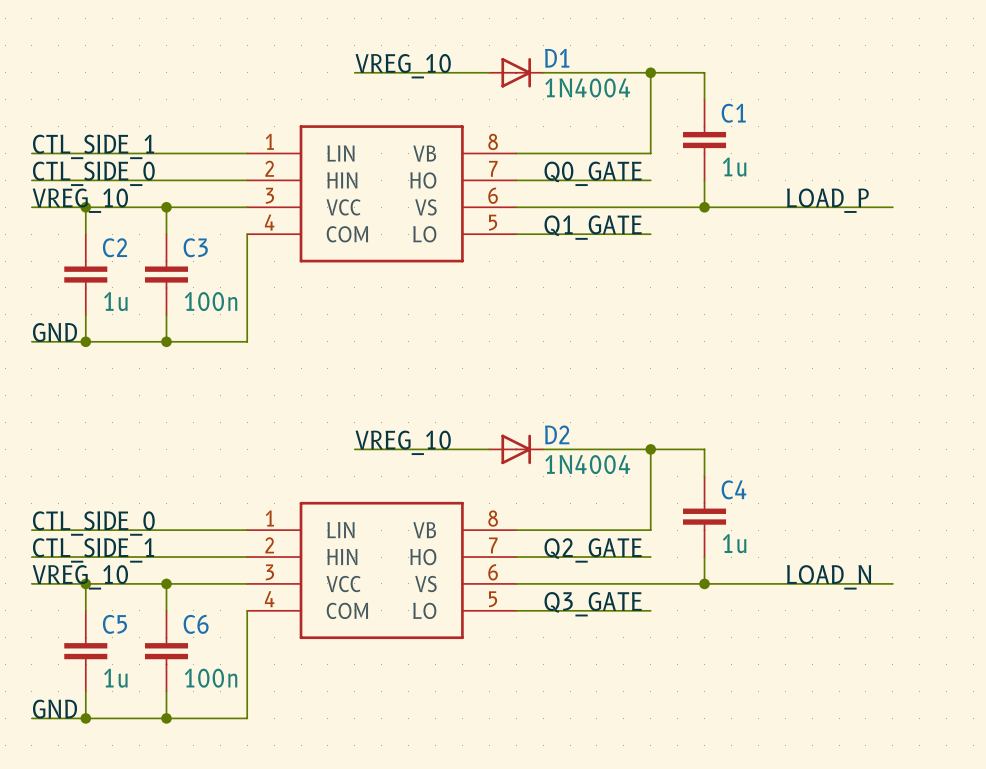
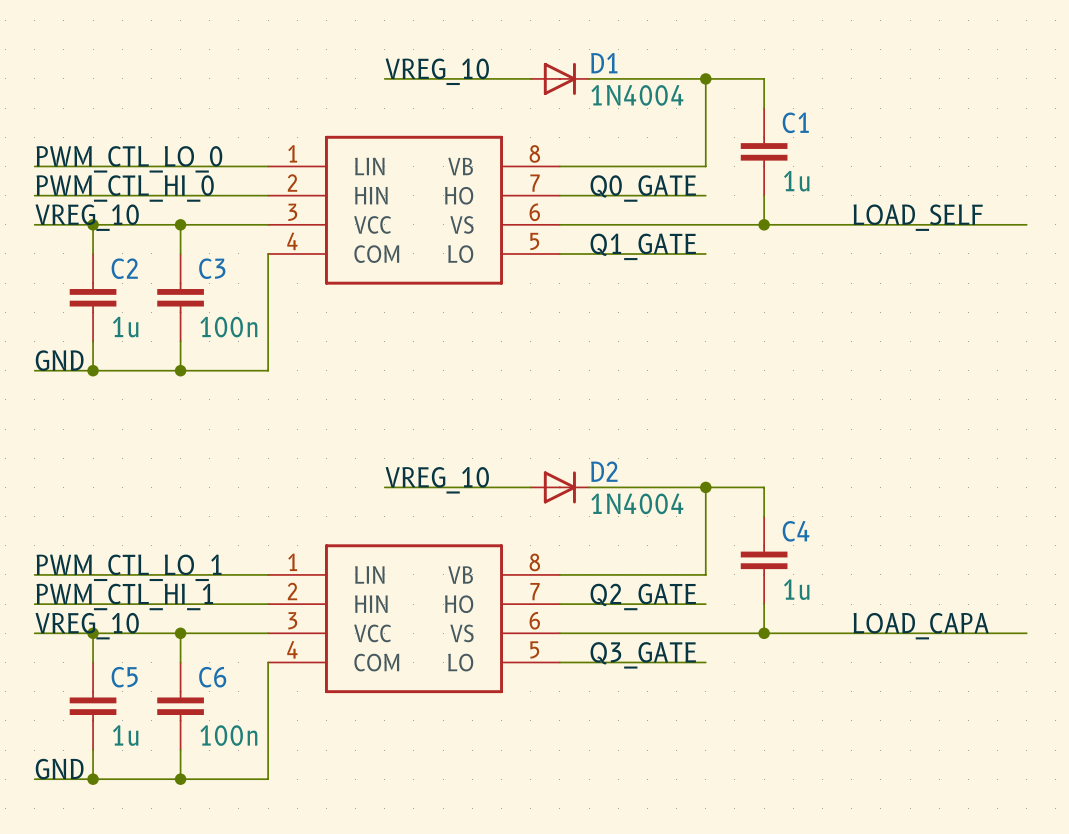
label: CTL_SIDE_1 (93, 146) -> PWM_CTL_LO_0 (129, 159)
label: CTL_SIDE_0 (93, 173) -> PWM_CTL_HI_0 (125, 188)
label: LOAD_P (827, 200) -> LOAD_SELF (918, 217)
wire: none -> (968, 224) (1026, 224)
label: CTL_SIDE_0 (93, 523) -> PWM_CTL_LO_1 (129, 567)
label: CTL_SIDE_1 (93, 550) -> PWM_CTL_HI_1 (124, 596)
label: LOAD_N (829, 577) -> LOAD_CAPA (921, 626)
wire: none -> (968, 633) (1026, 633)

